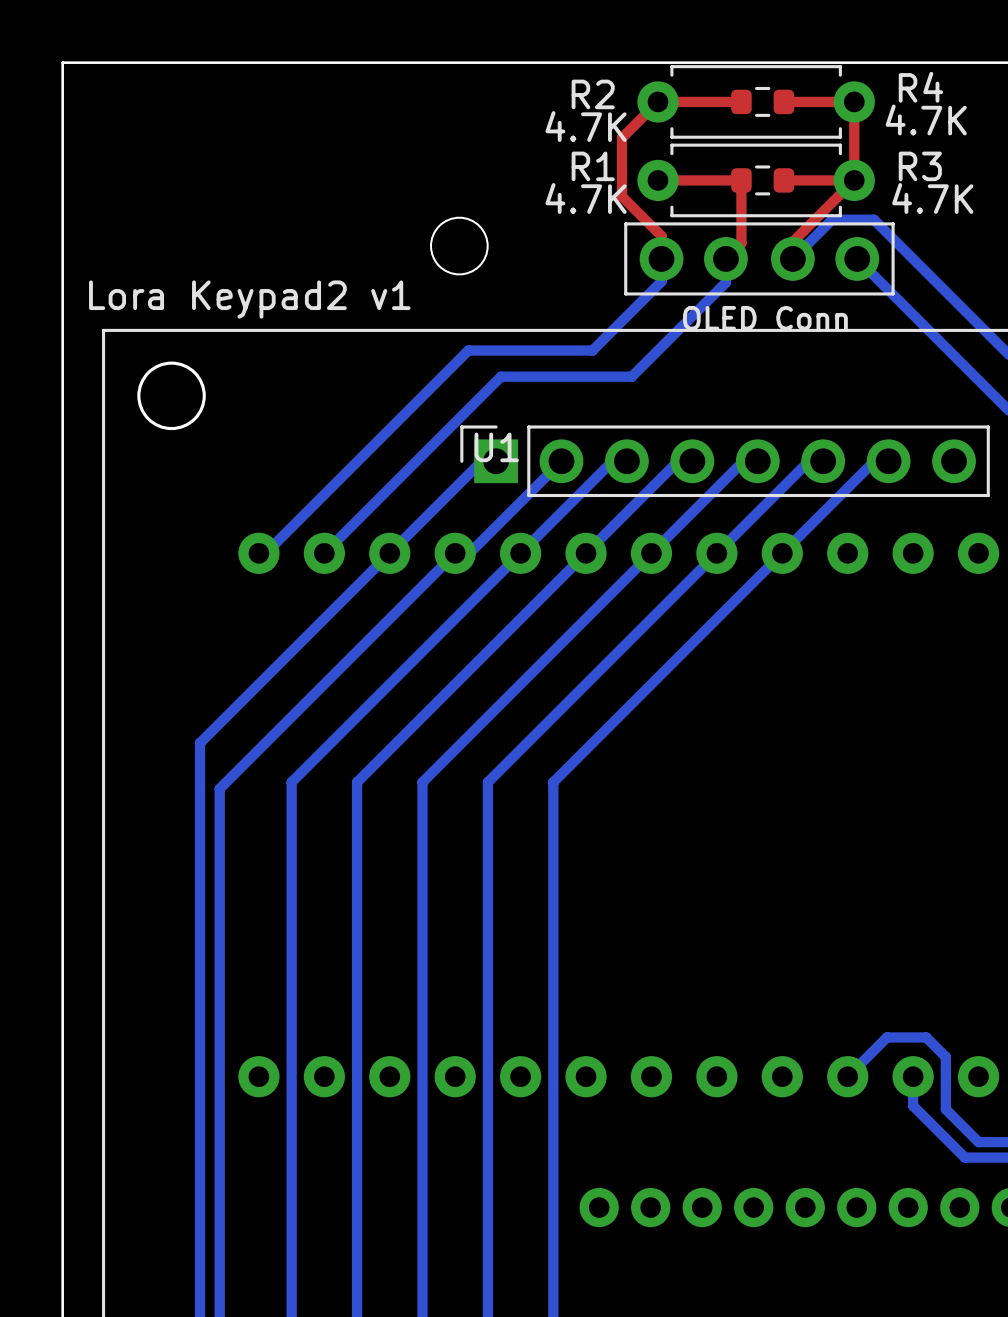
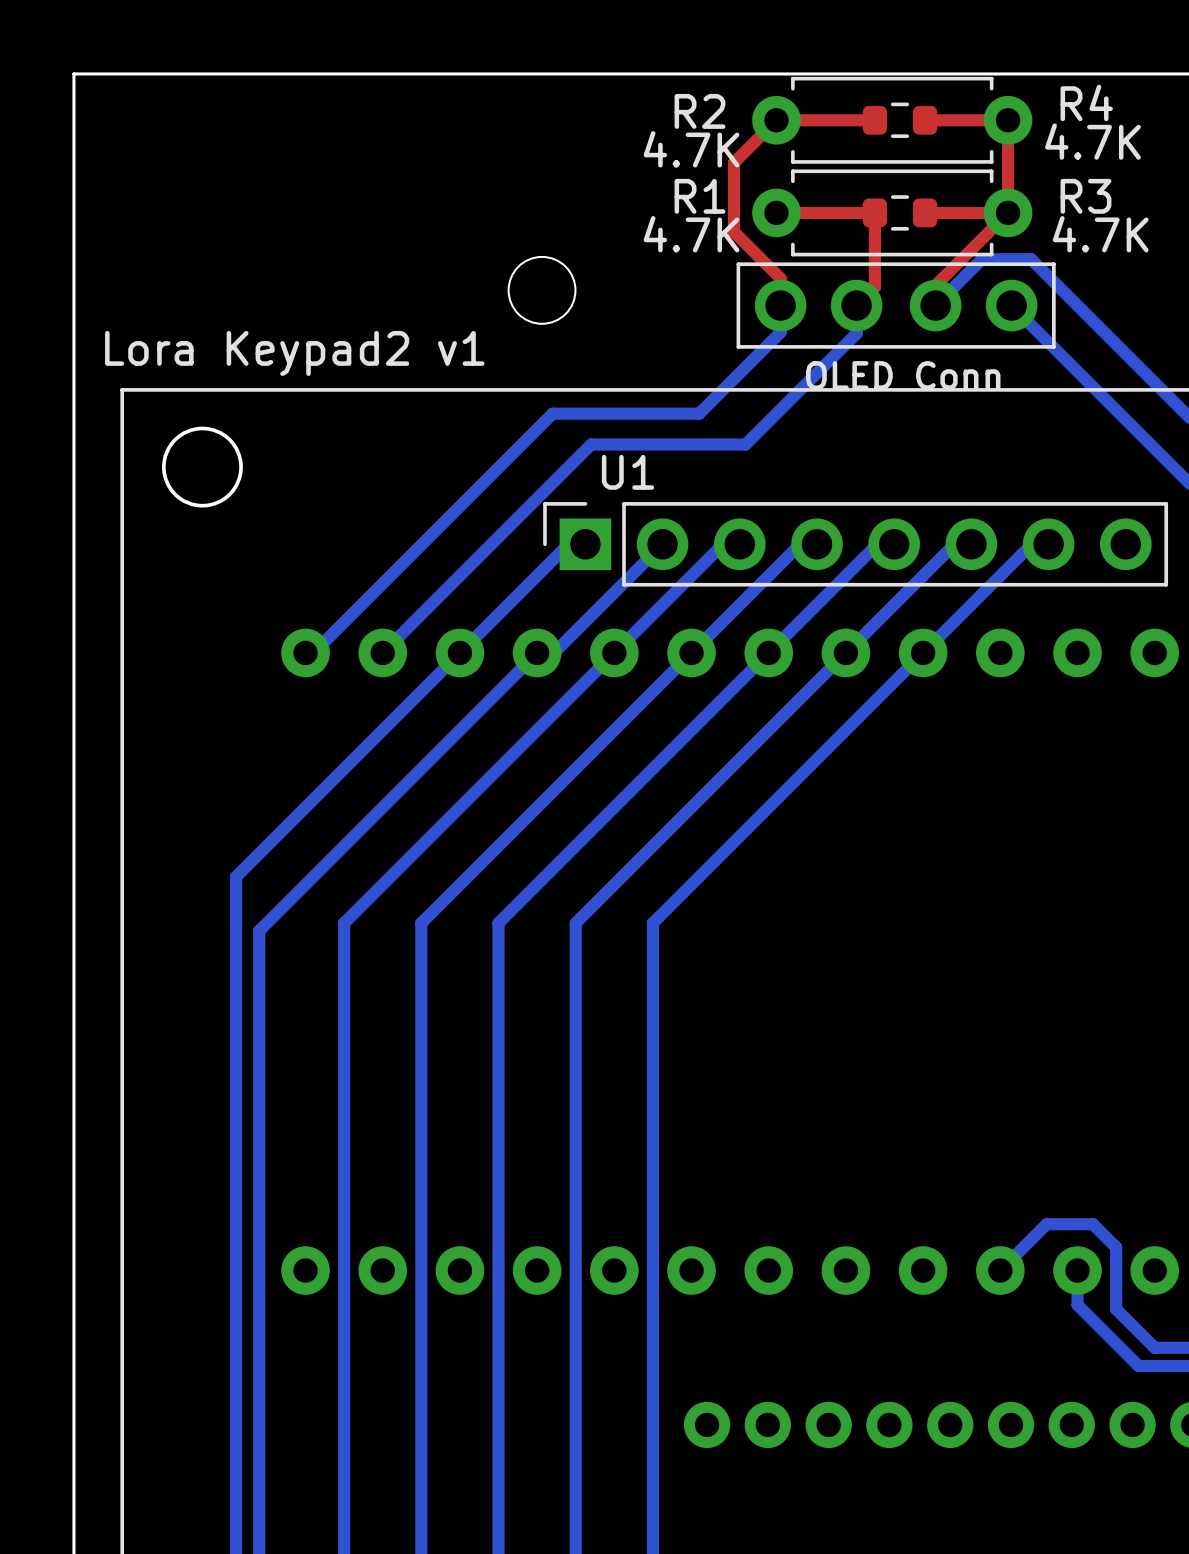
U1 name position: U1 (496, 447) -> U1 (627, 472)

